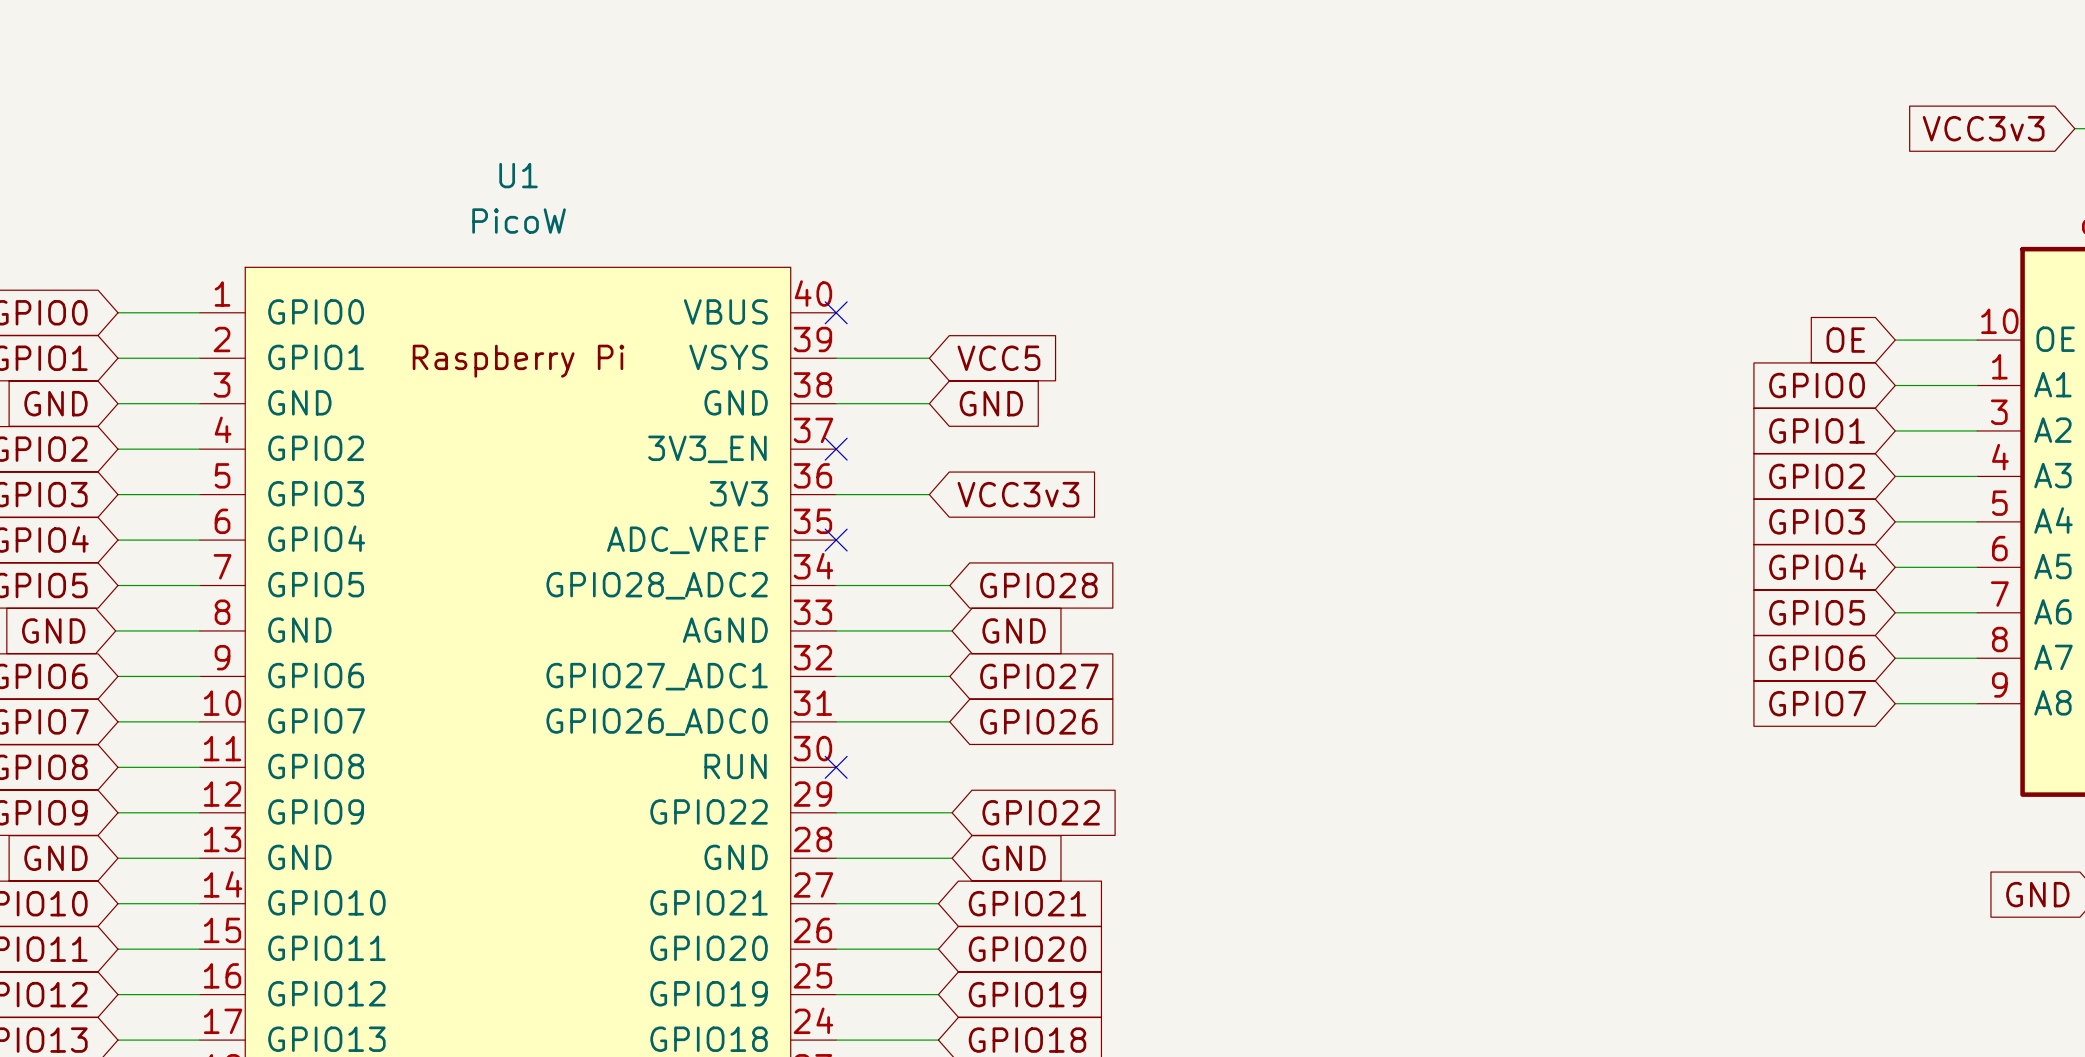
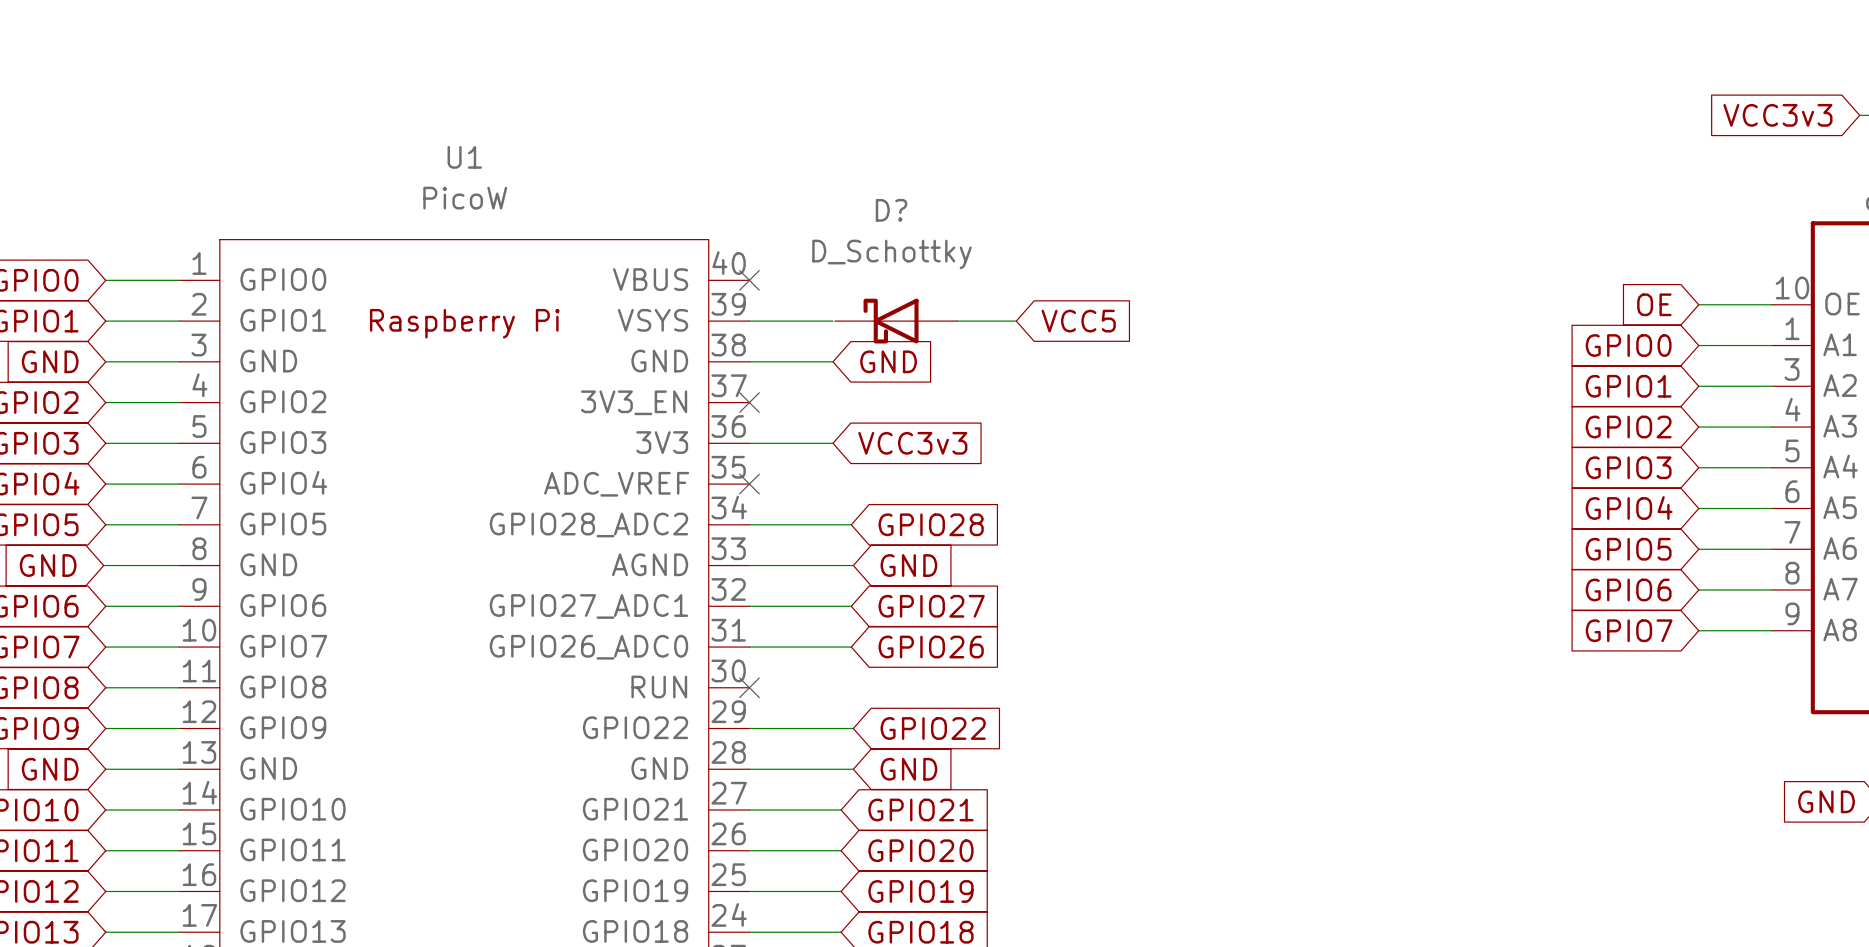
global label position: VCC5 (998, 358) -> VCC5 (1078, 321)
D?: none -> D_Schottky (896, 321)
wire: none -> (957, 321) (1016, 321)

